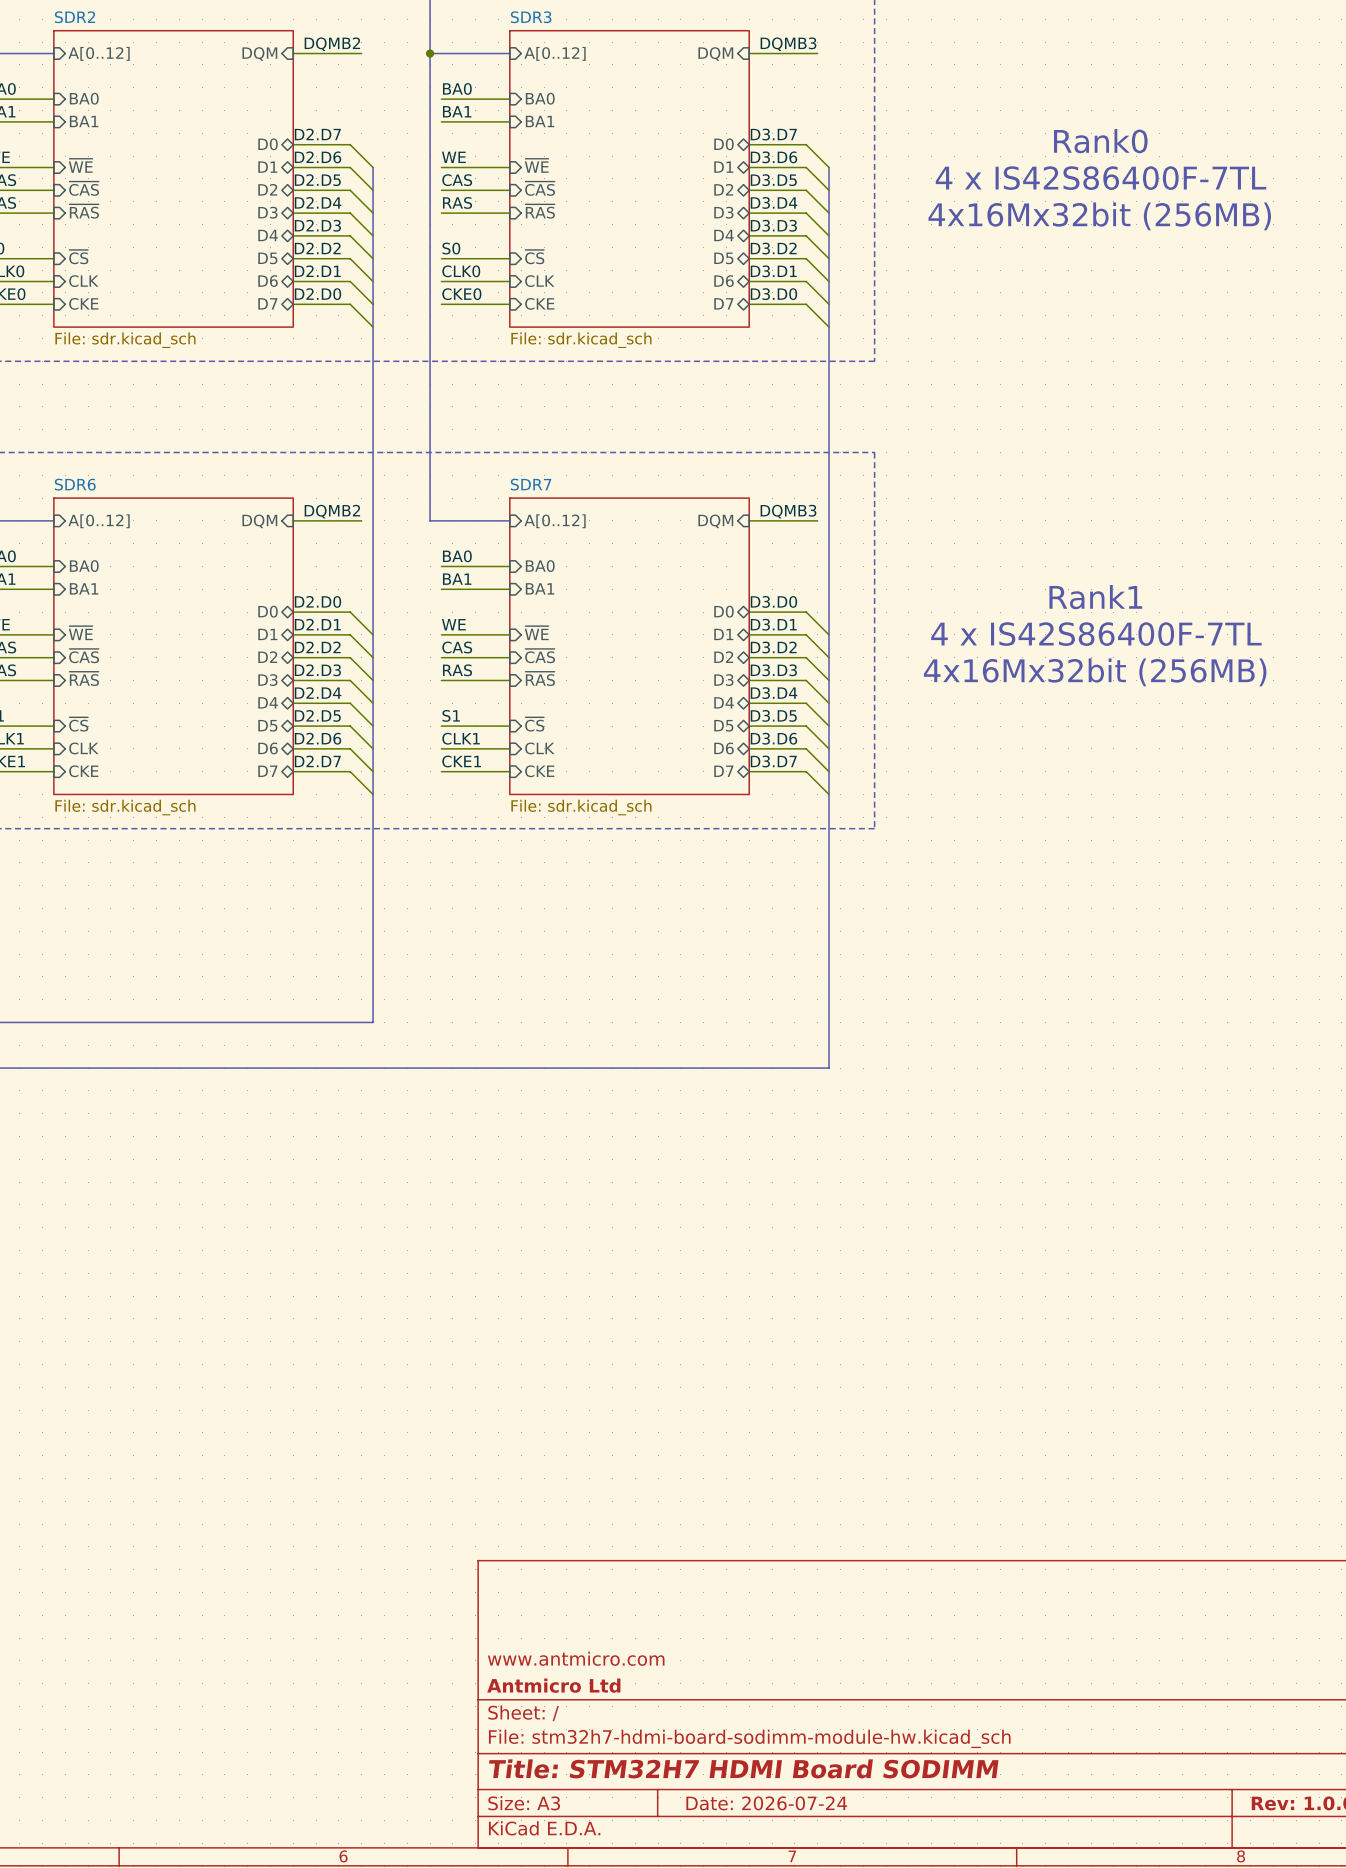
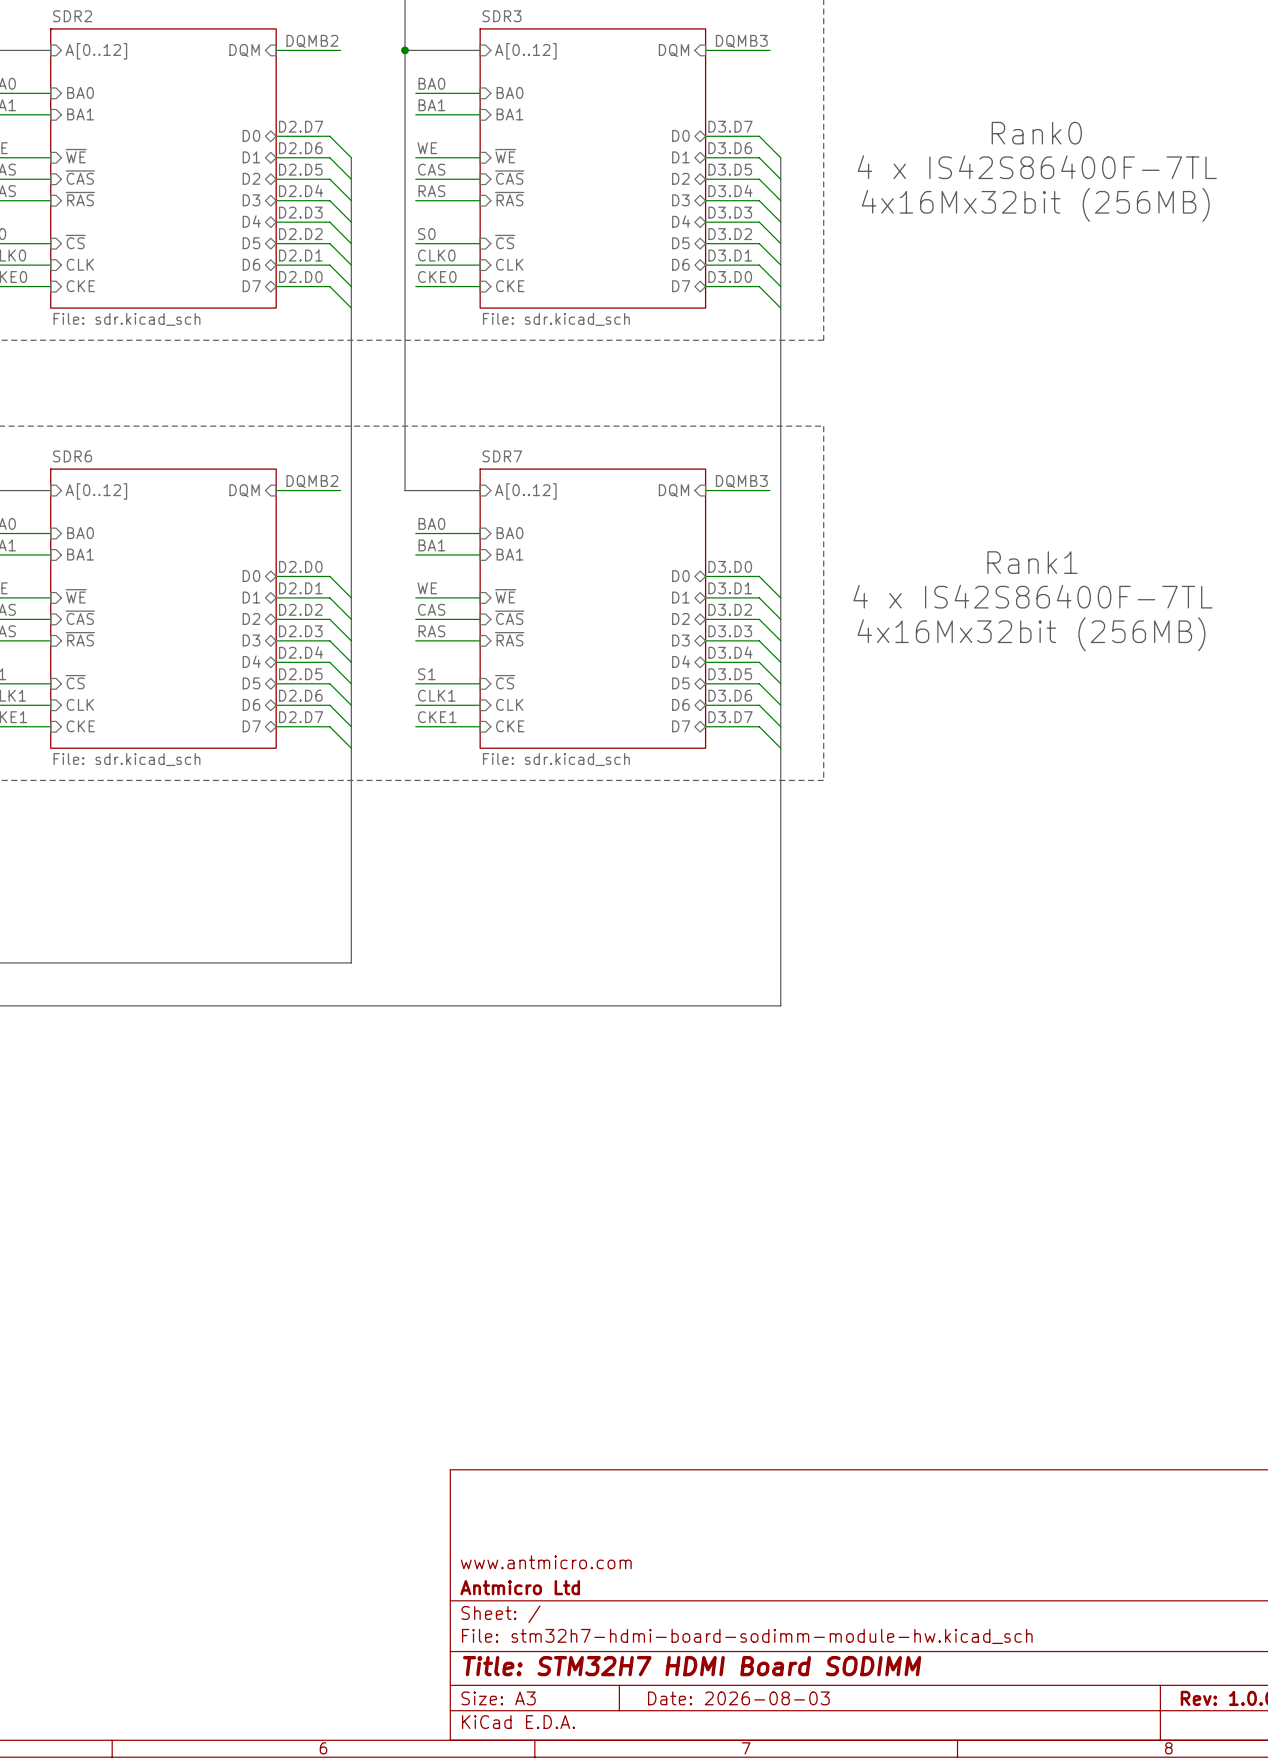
title block: Date: 2026-07-24 (766, 1803) -> Date: 2026-08-03 (738, 1698)

